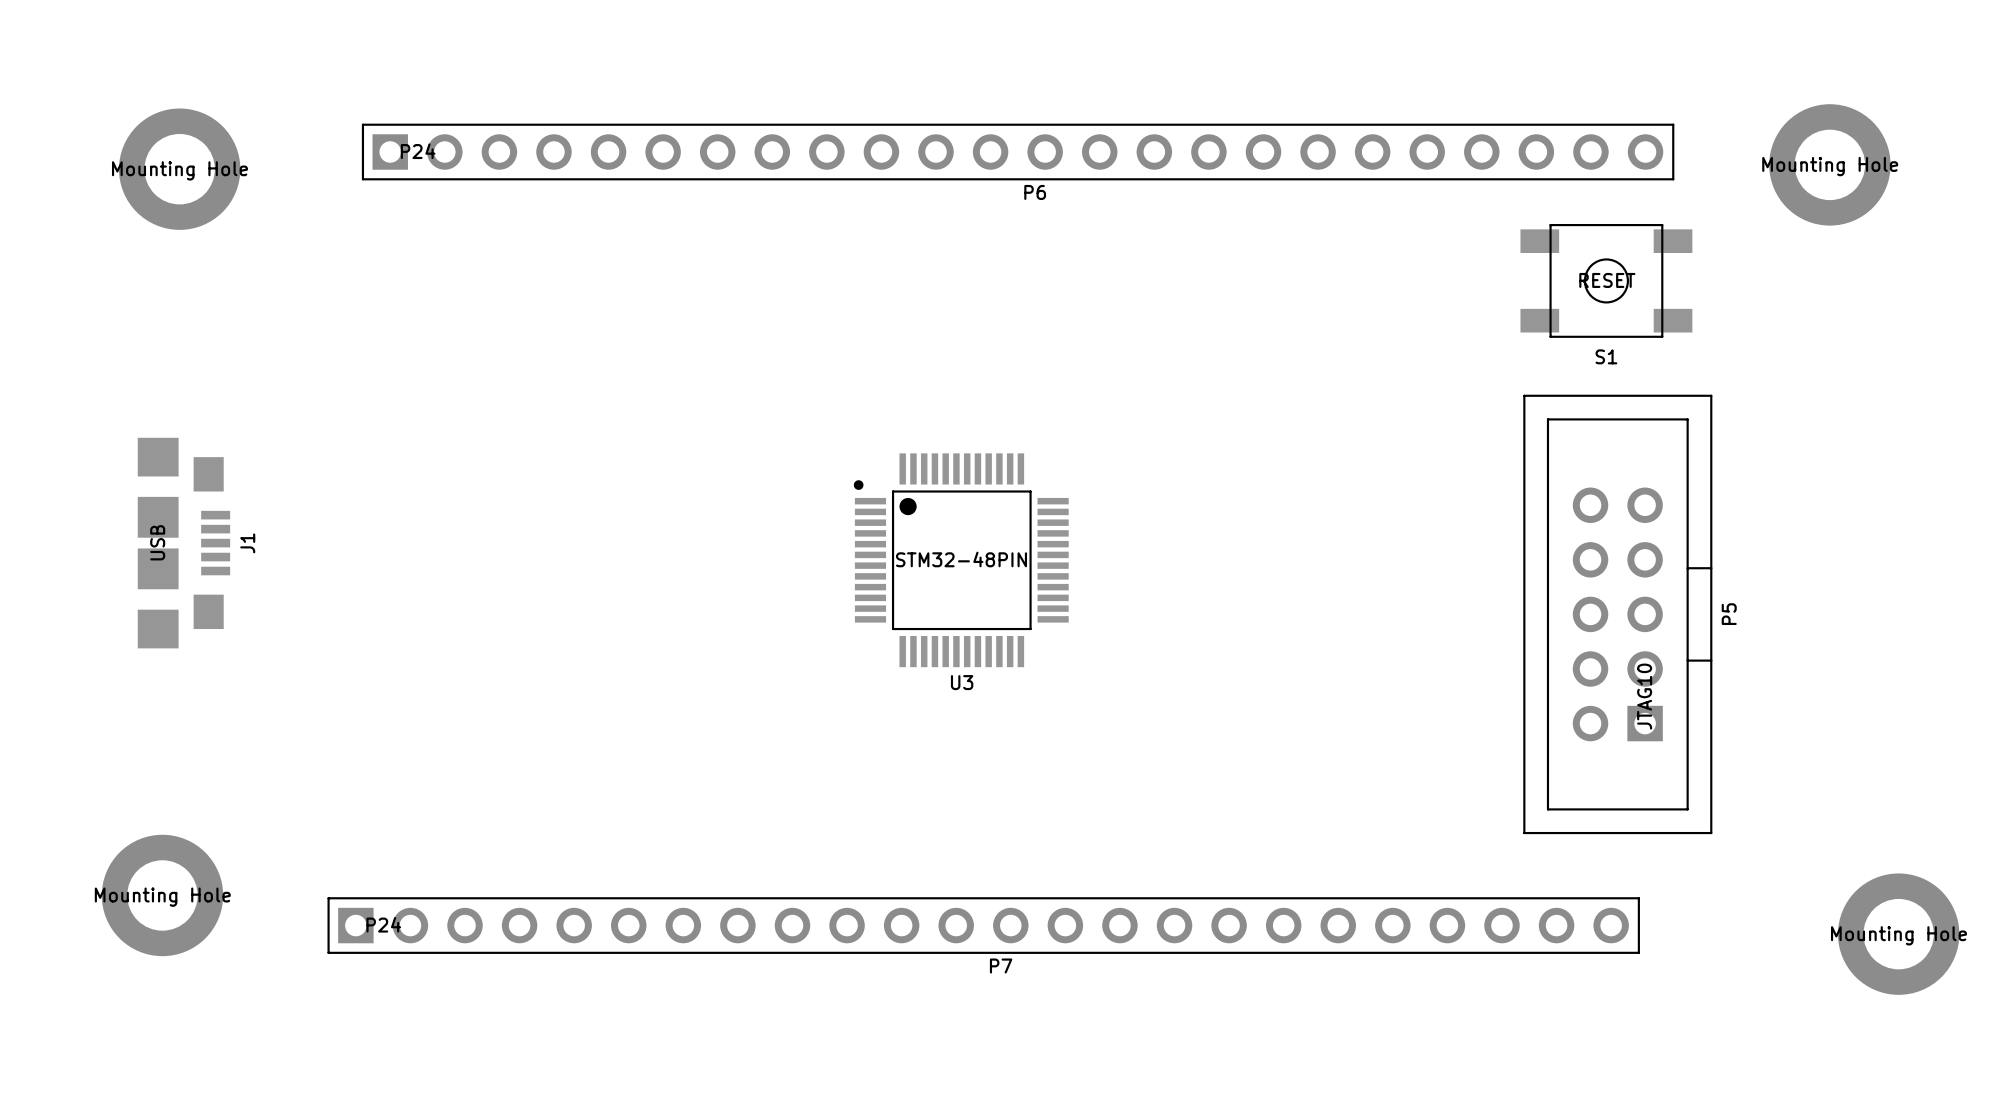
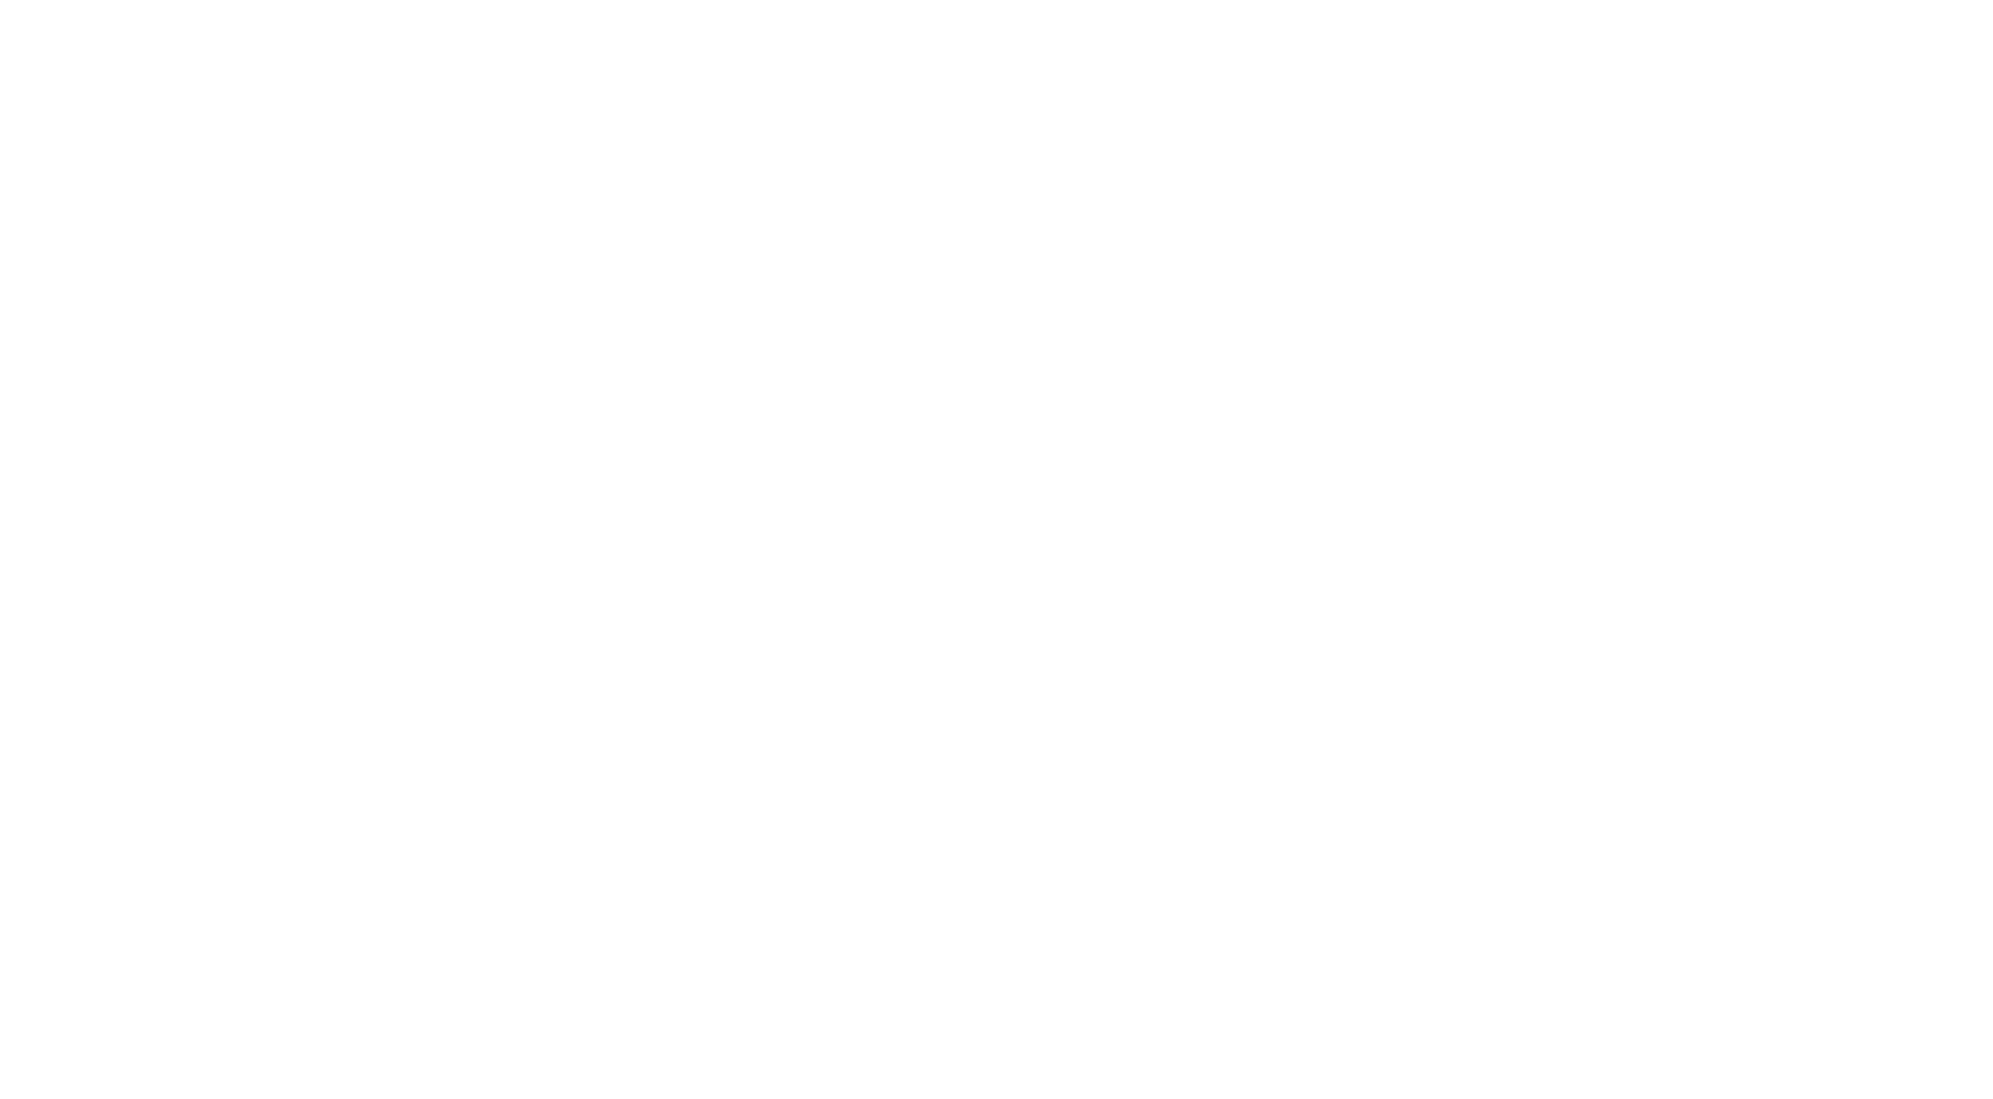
P6: P24 (1018, 152) -> none
part: Mounting Hole (1829, 164) -> none
part: Mounting Hole (179, 169) -> none
S1: RESET (1606, 280) -> none
J1: USB (183, 543) -> none
U3: STM32-48PIN (961, 560) -> none
P5: JTAG10 (1617, 614) -> none
part: Mounting Hole (162, 895) -> none
P7: P24 (983, 925) -> none
part: Mounting Hole (1898, 934) -> none

